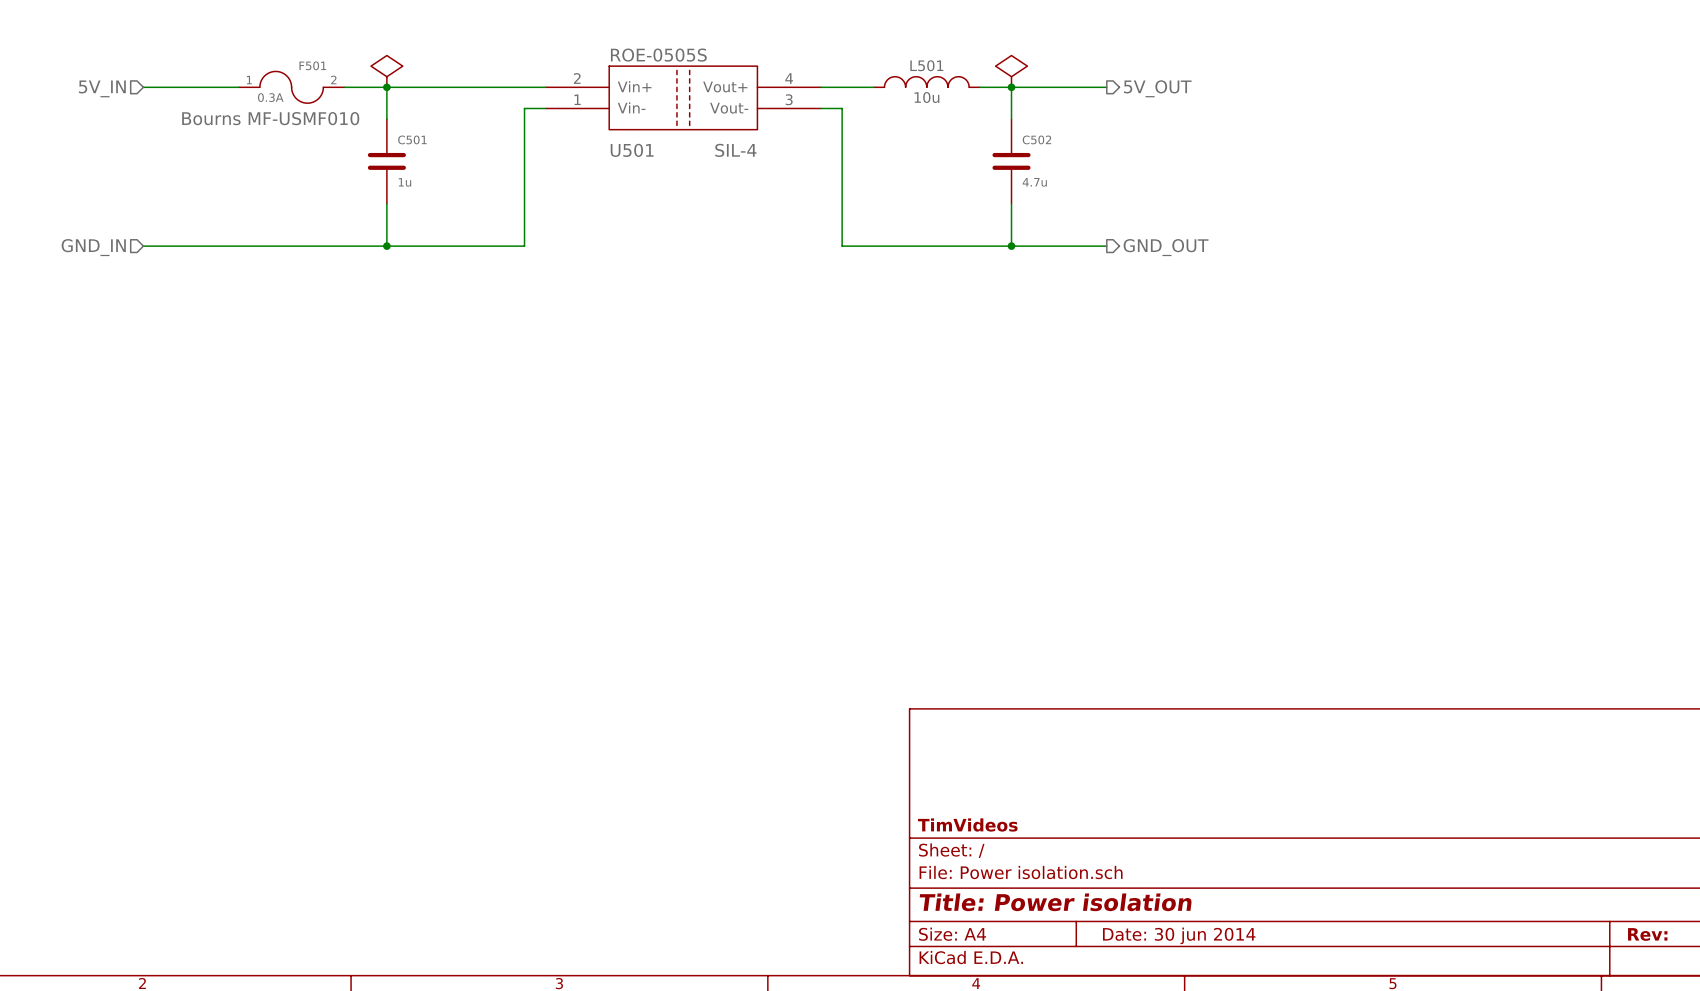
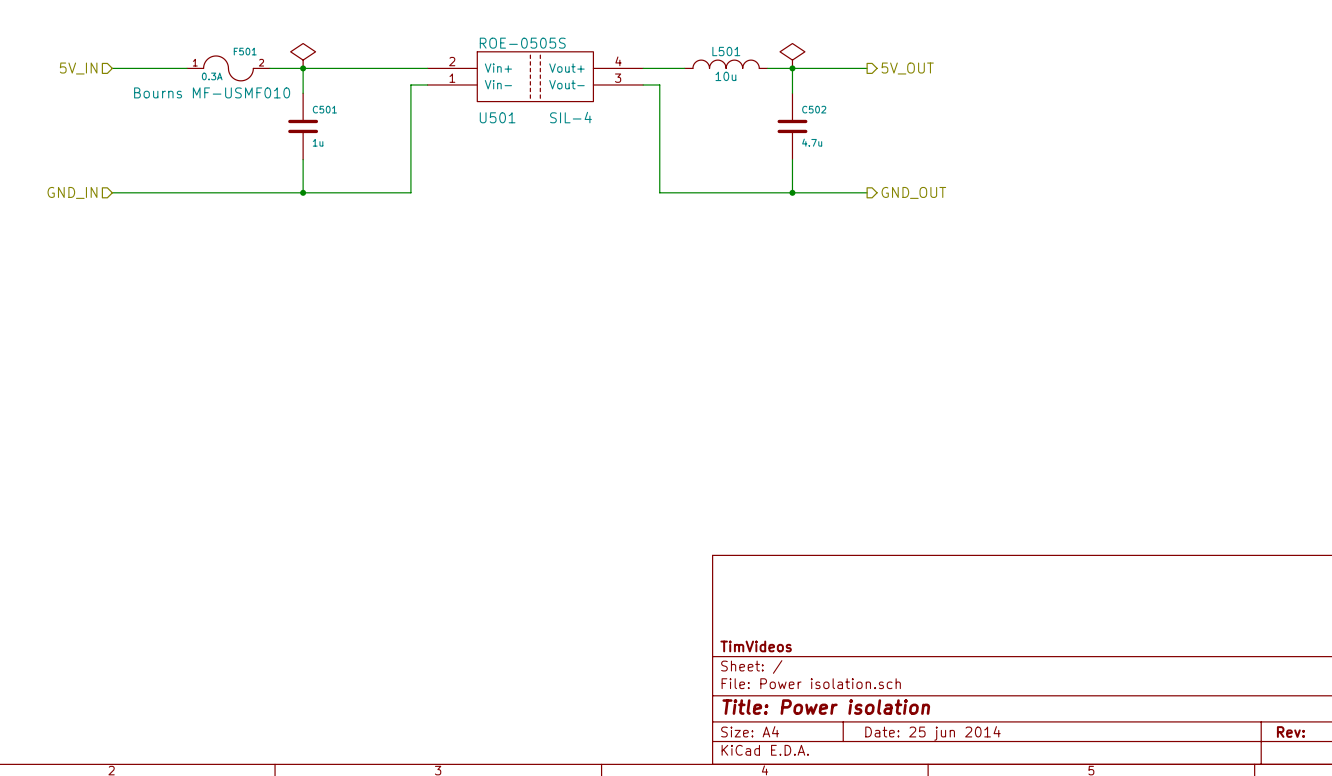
title block: Date: 30 jun 2014 (1179, 935) -> Date: 25 jun 2014 (932, 733)

